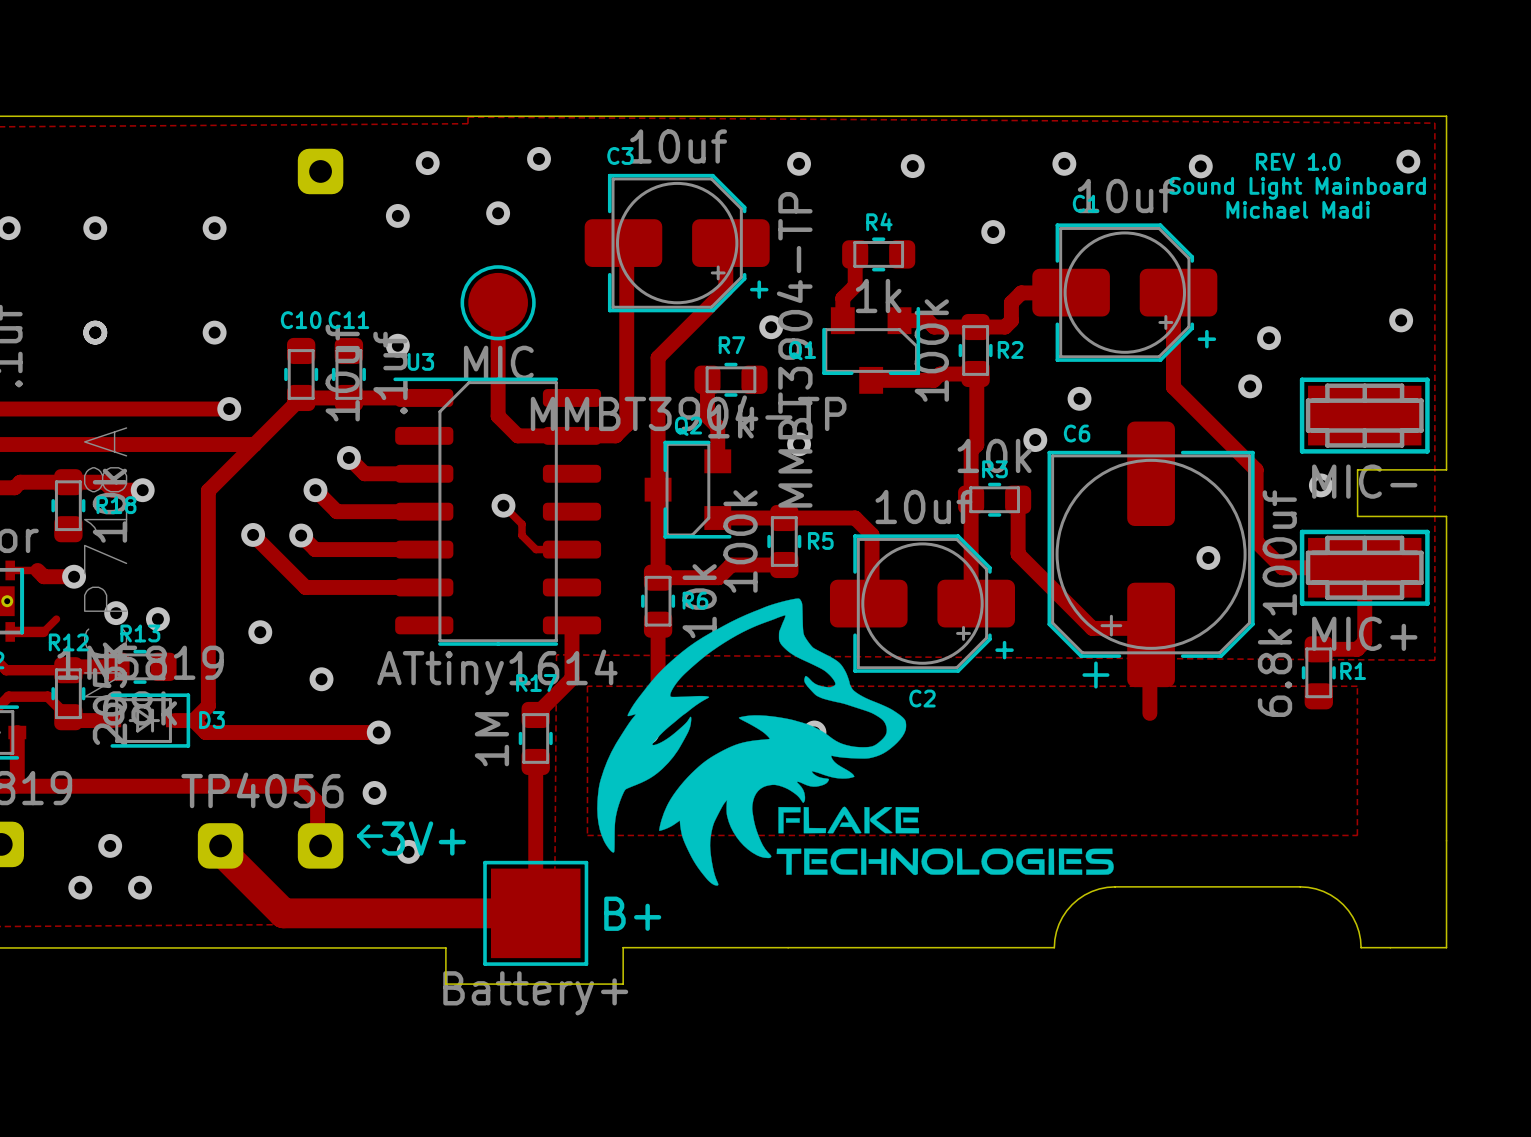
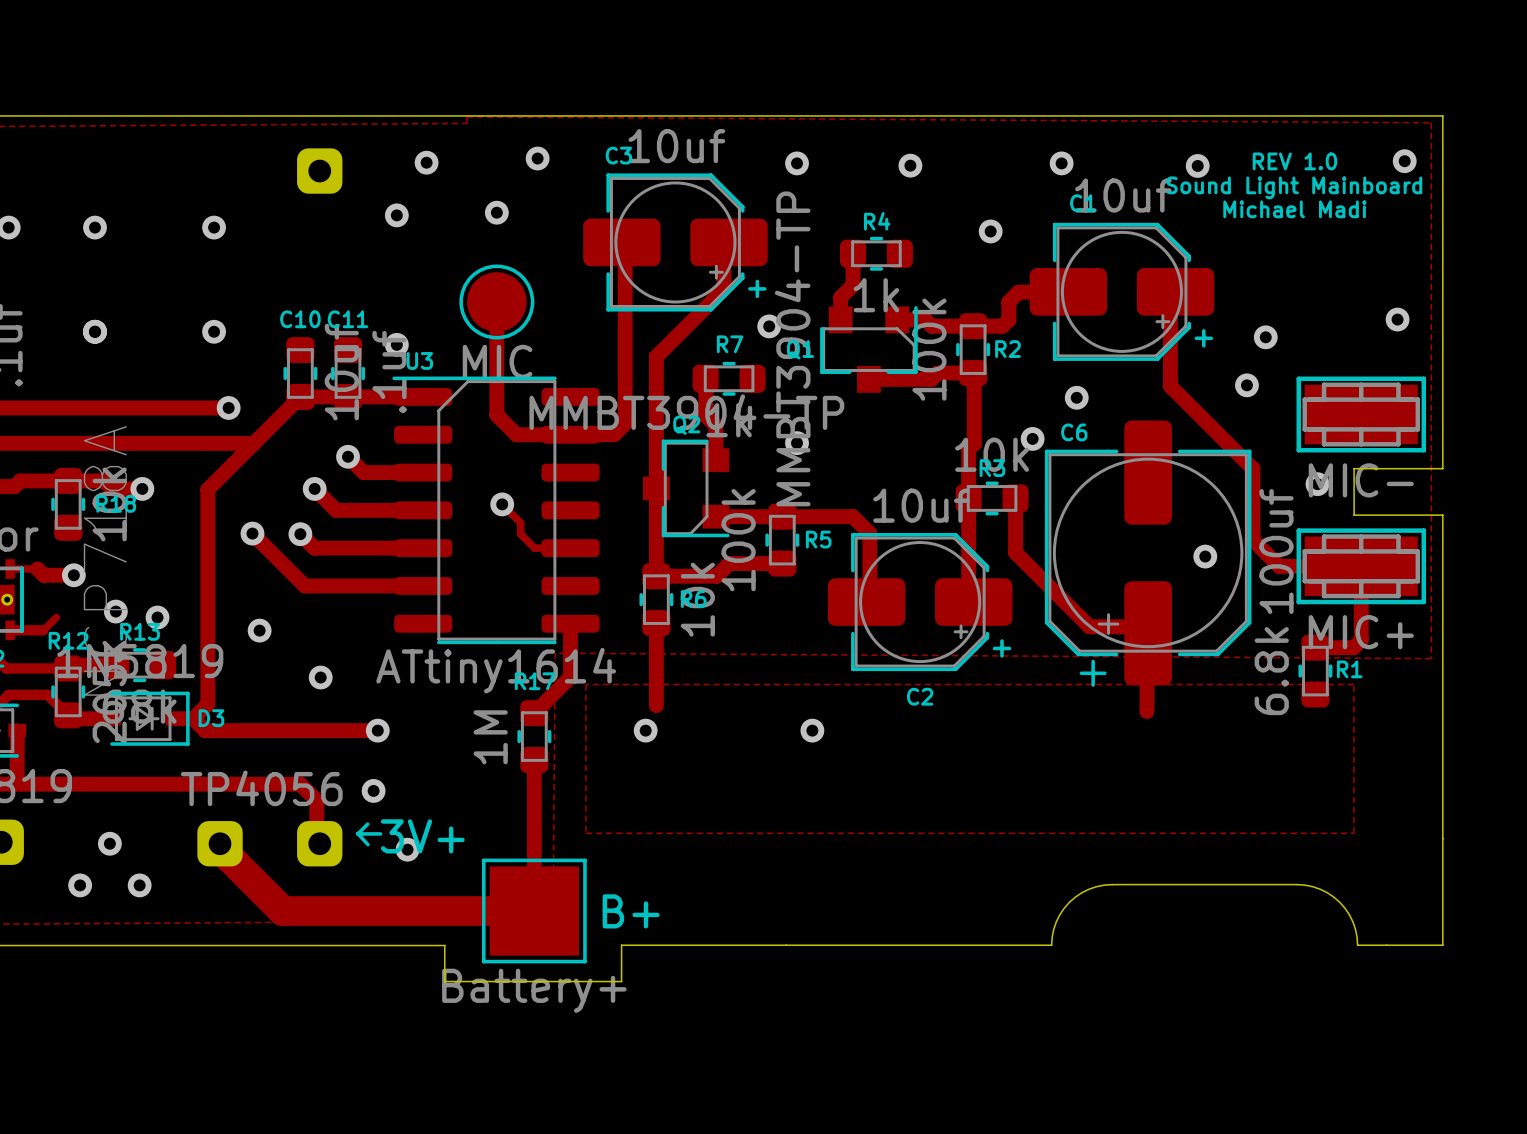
drawing: [597, 598, 1114, 886] -> none

